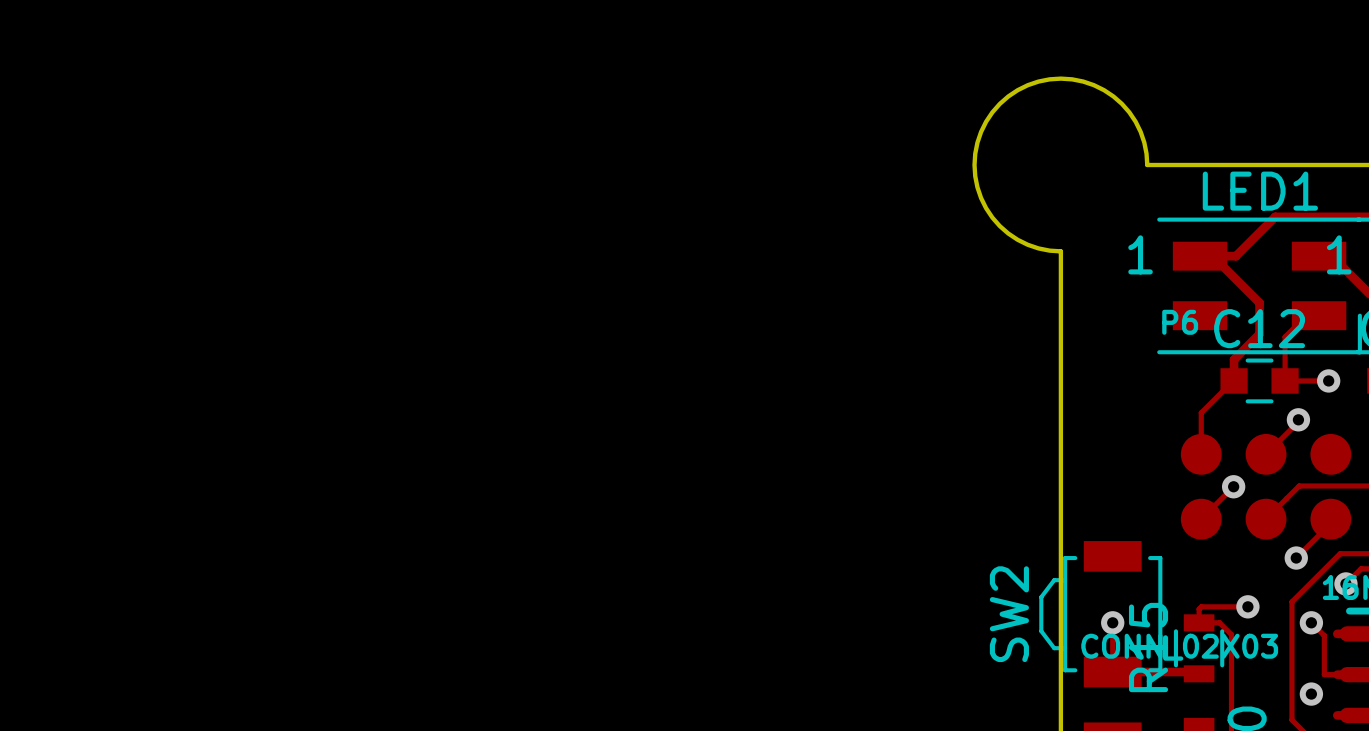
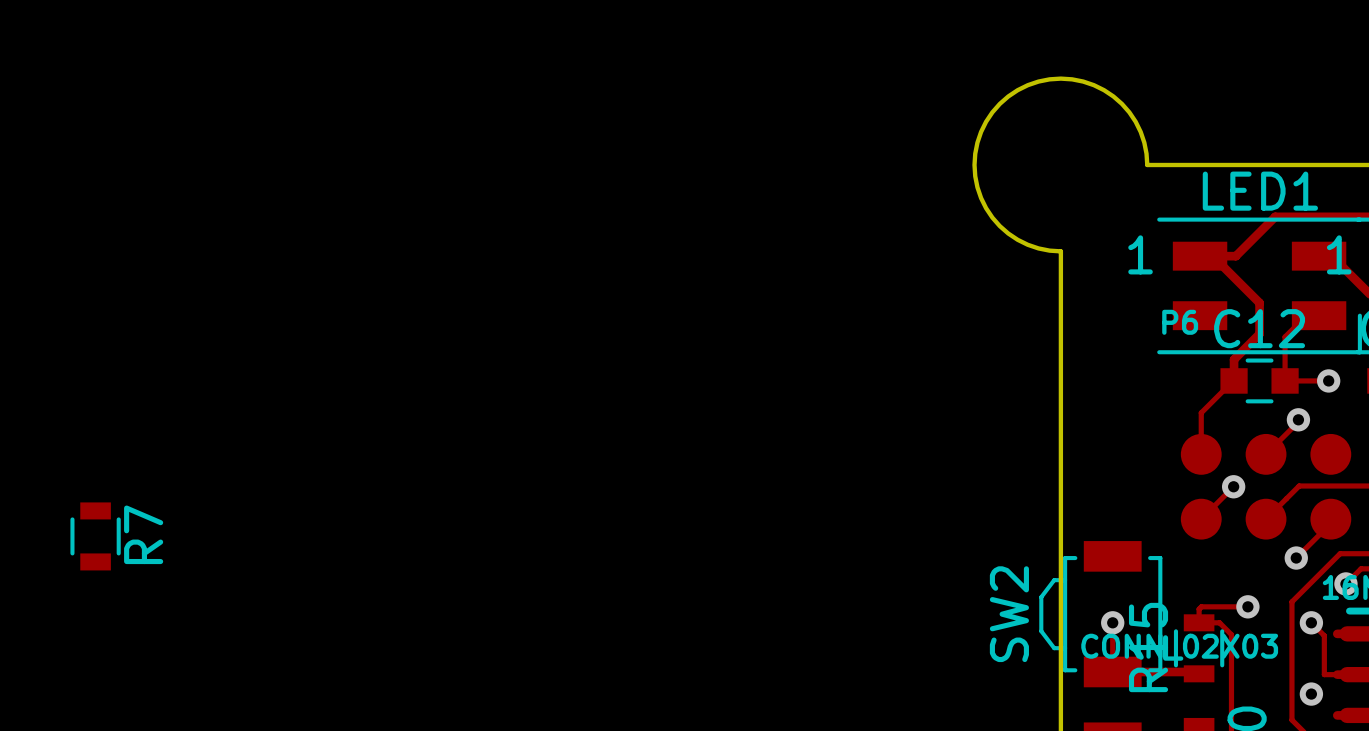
R7: none -> (95, 536)

